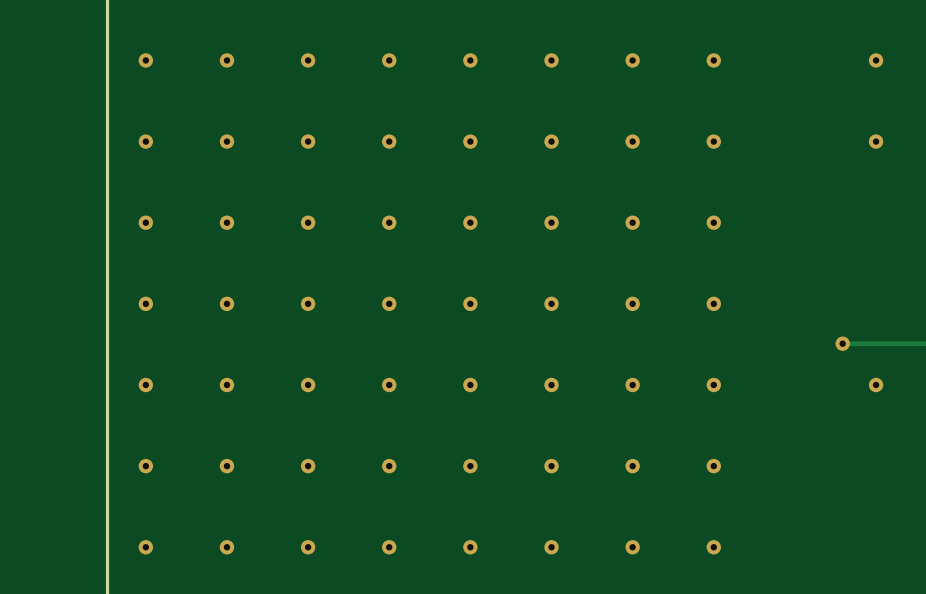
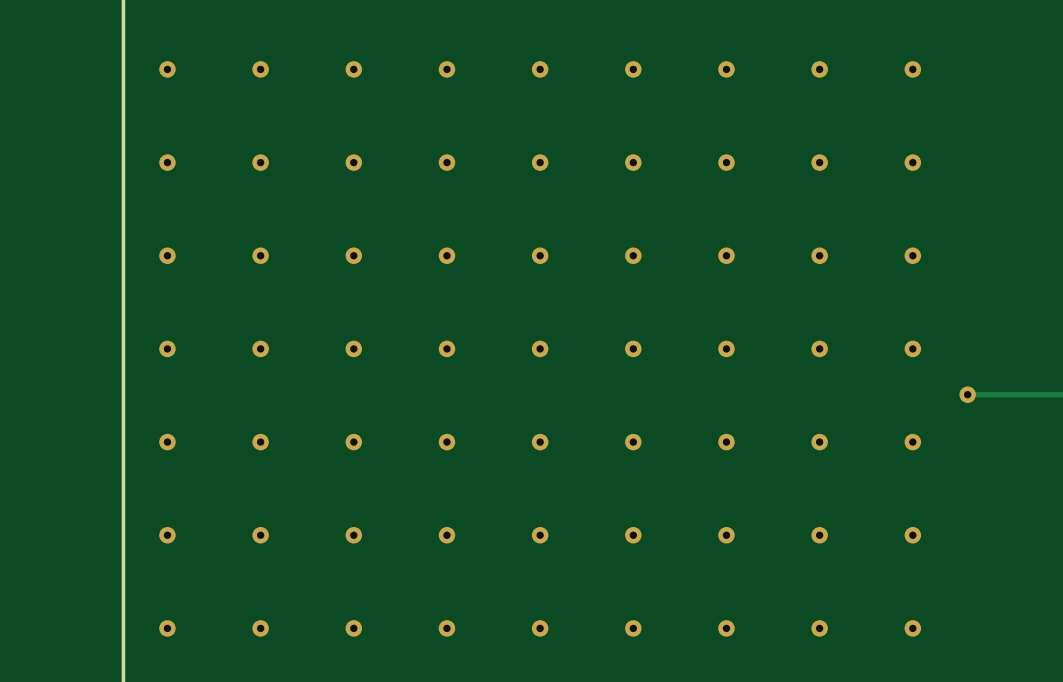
via: none -> (912, 69)
via: (876, 60) -> none
via: none -> (912, 162)
via: (876, 141) -> none
via: none -> (912, 255)
via: none -> (912, 348)
via: none -> (912, 442)
via: (876, 384) -> none
via: none -> (912, 535)
via: none -> (912, 628)

